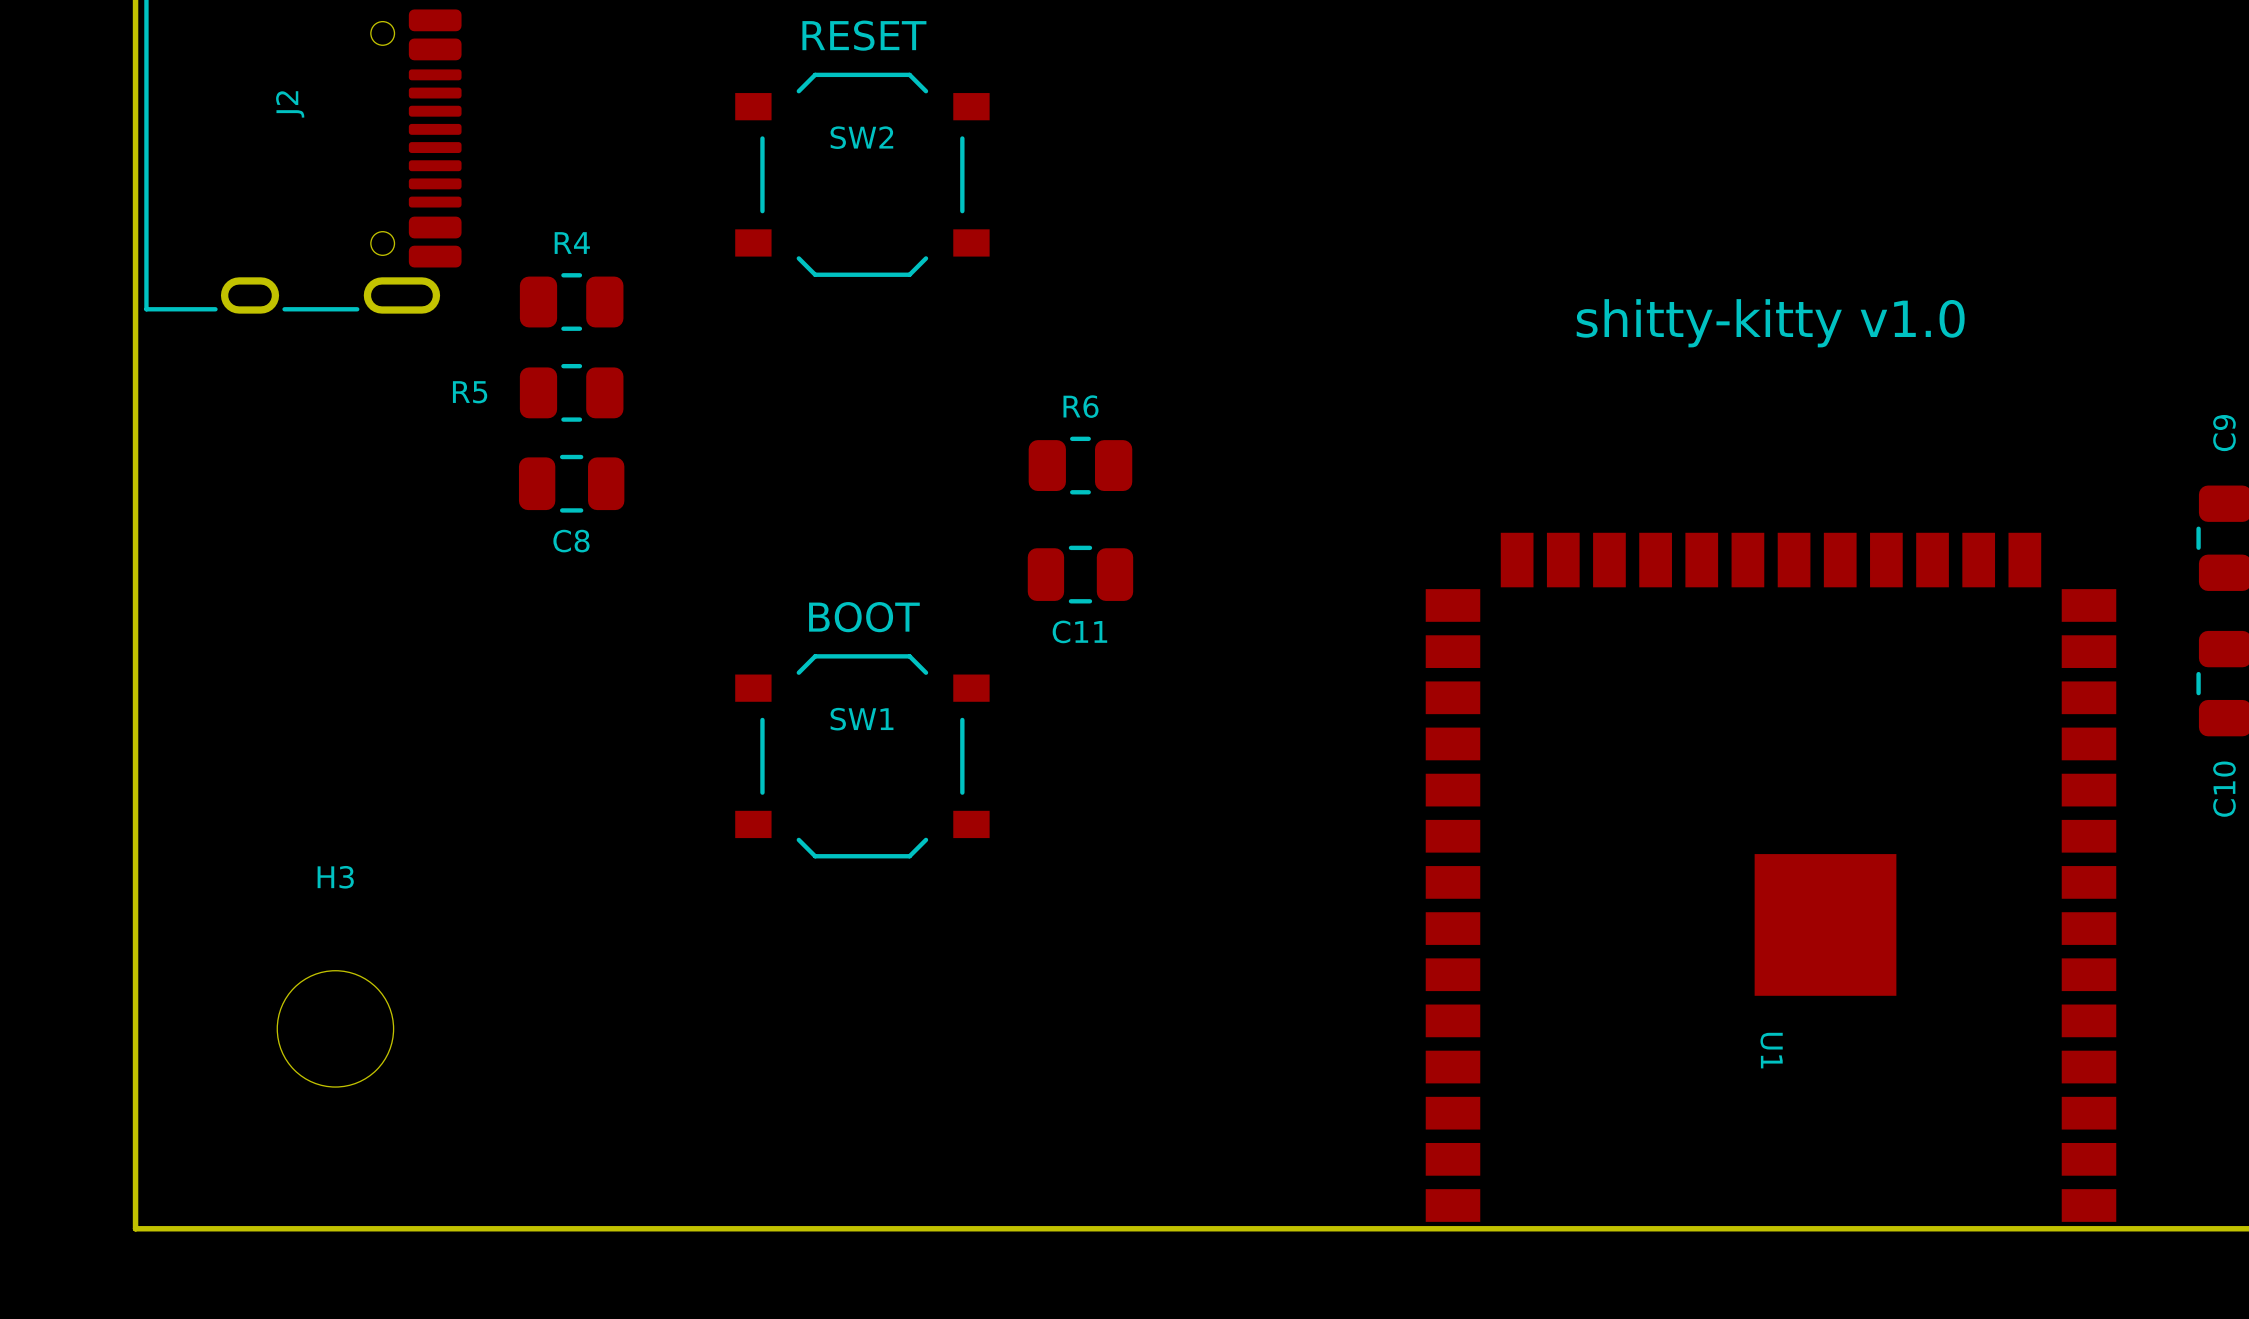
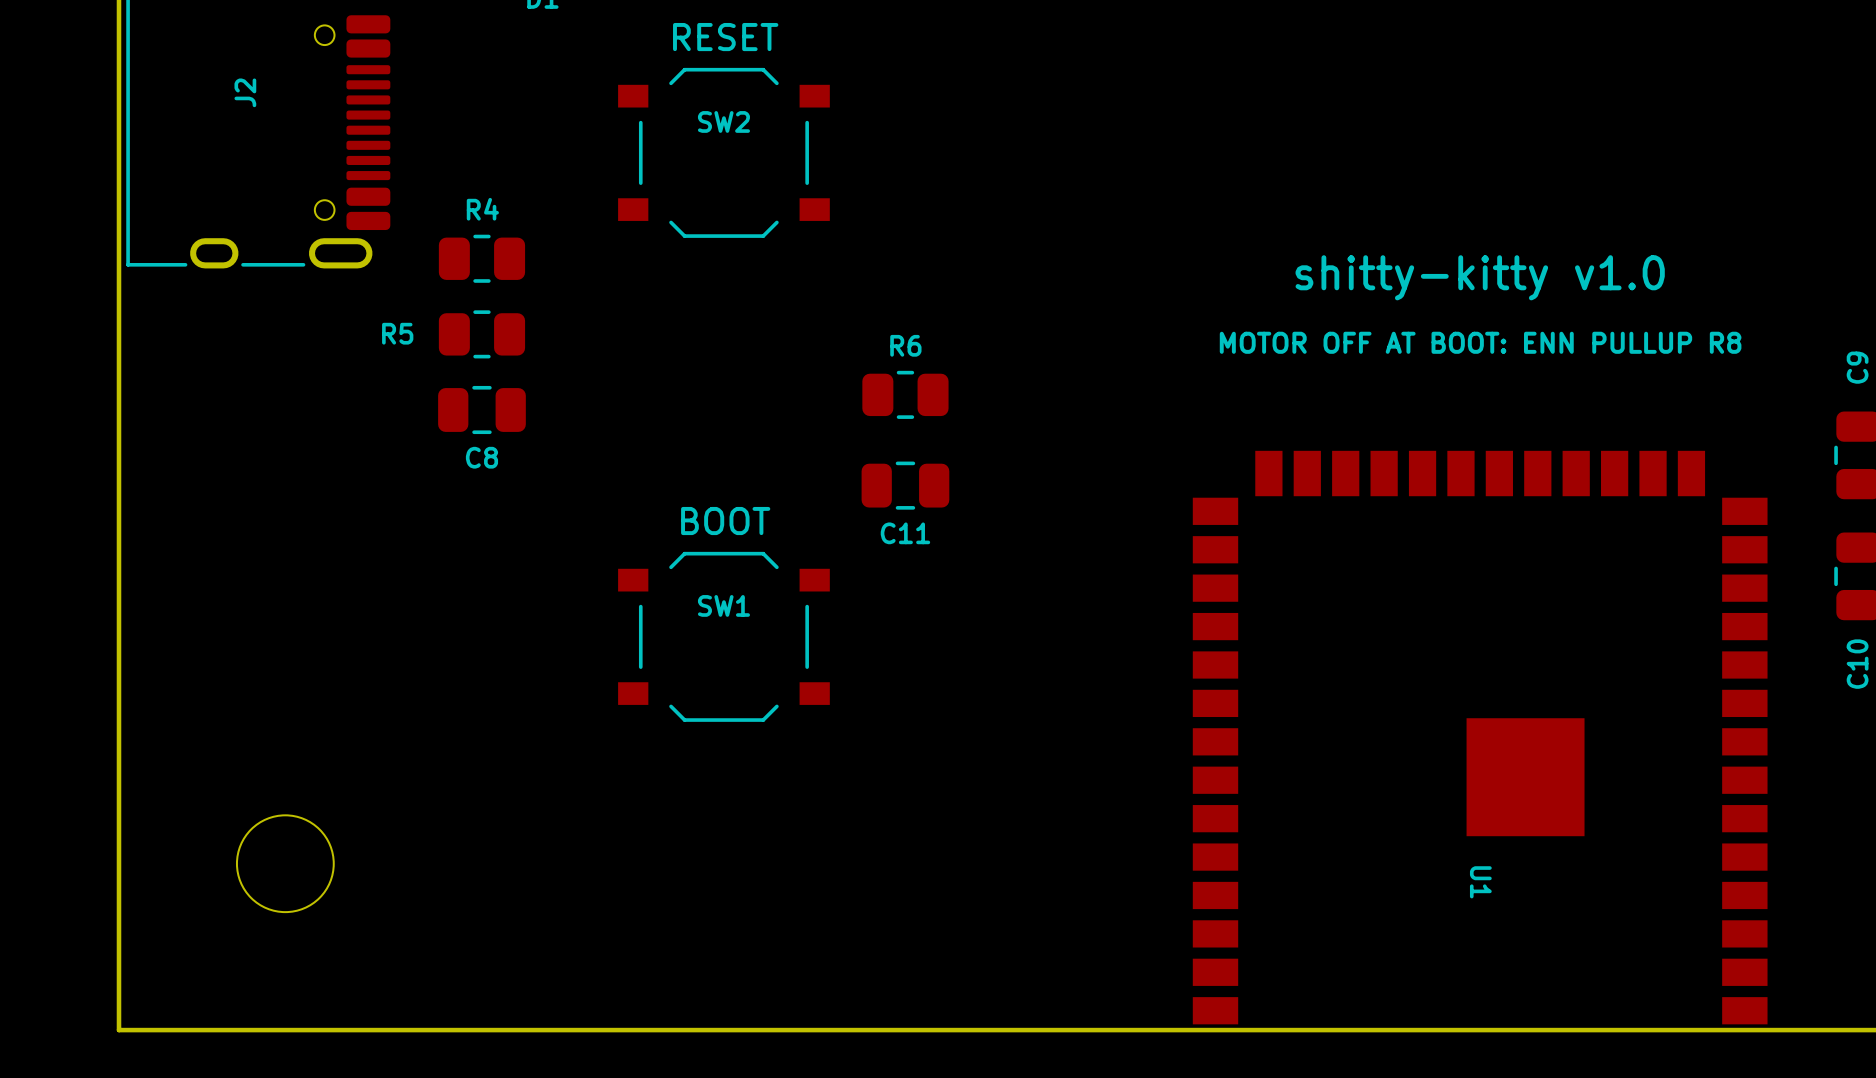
text: none -> MOTOR OFF AT BOOT: ENN PULLUP R8 (1480, 342)
H3 name: H3 (335, 877) -> none

